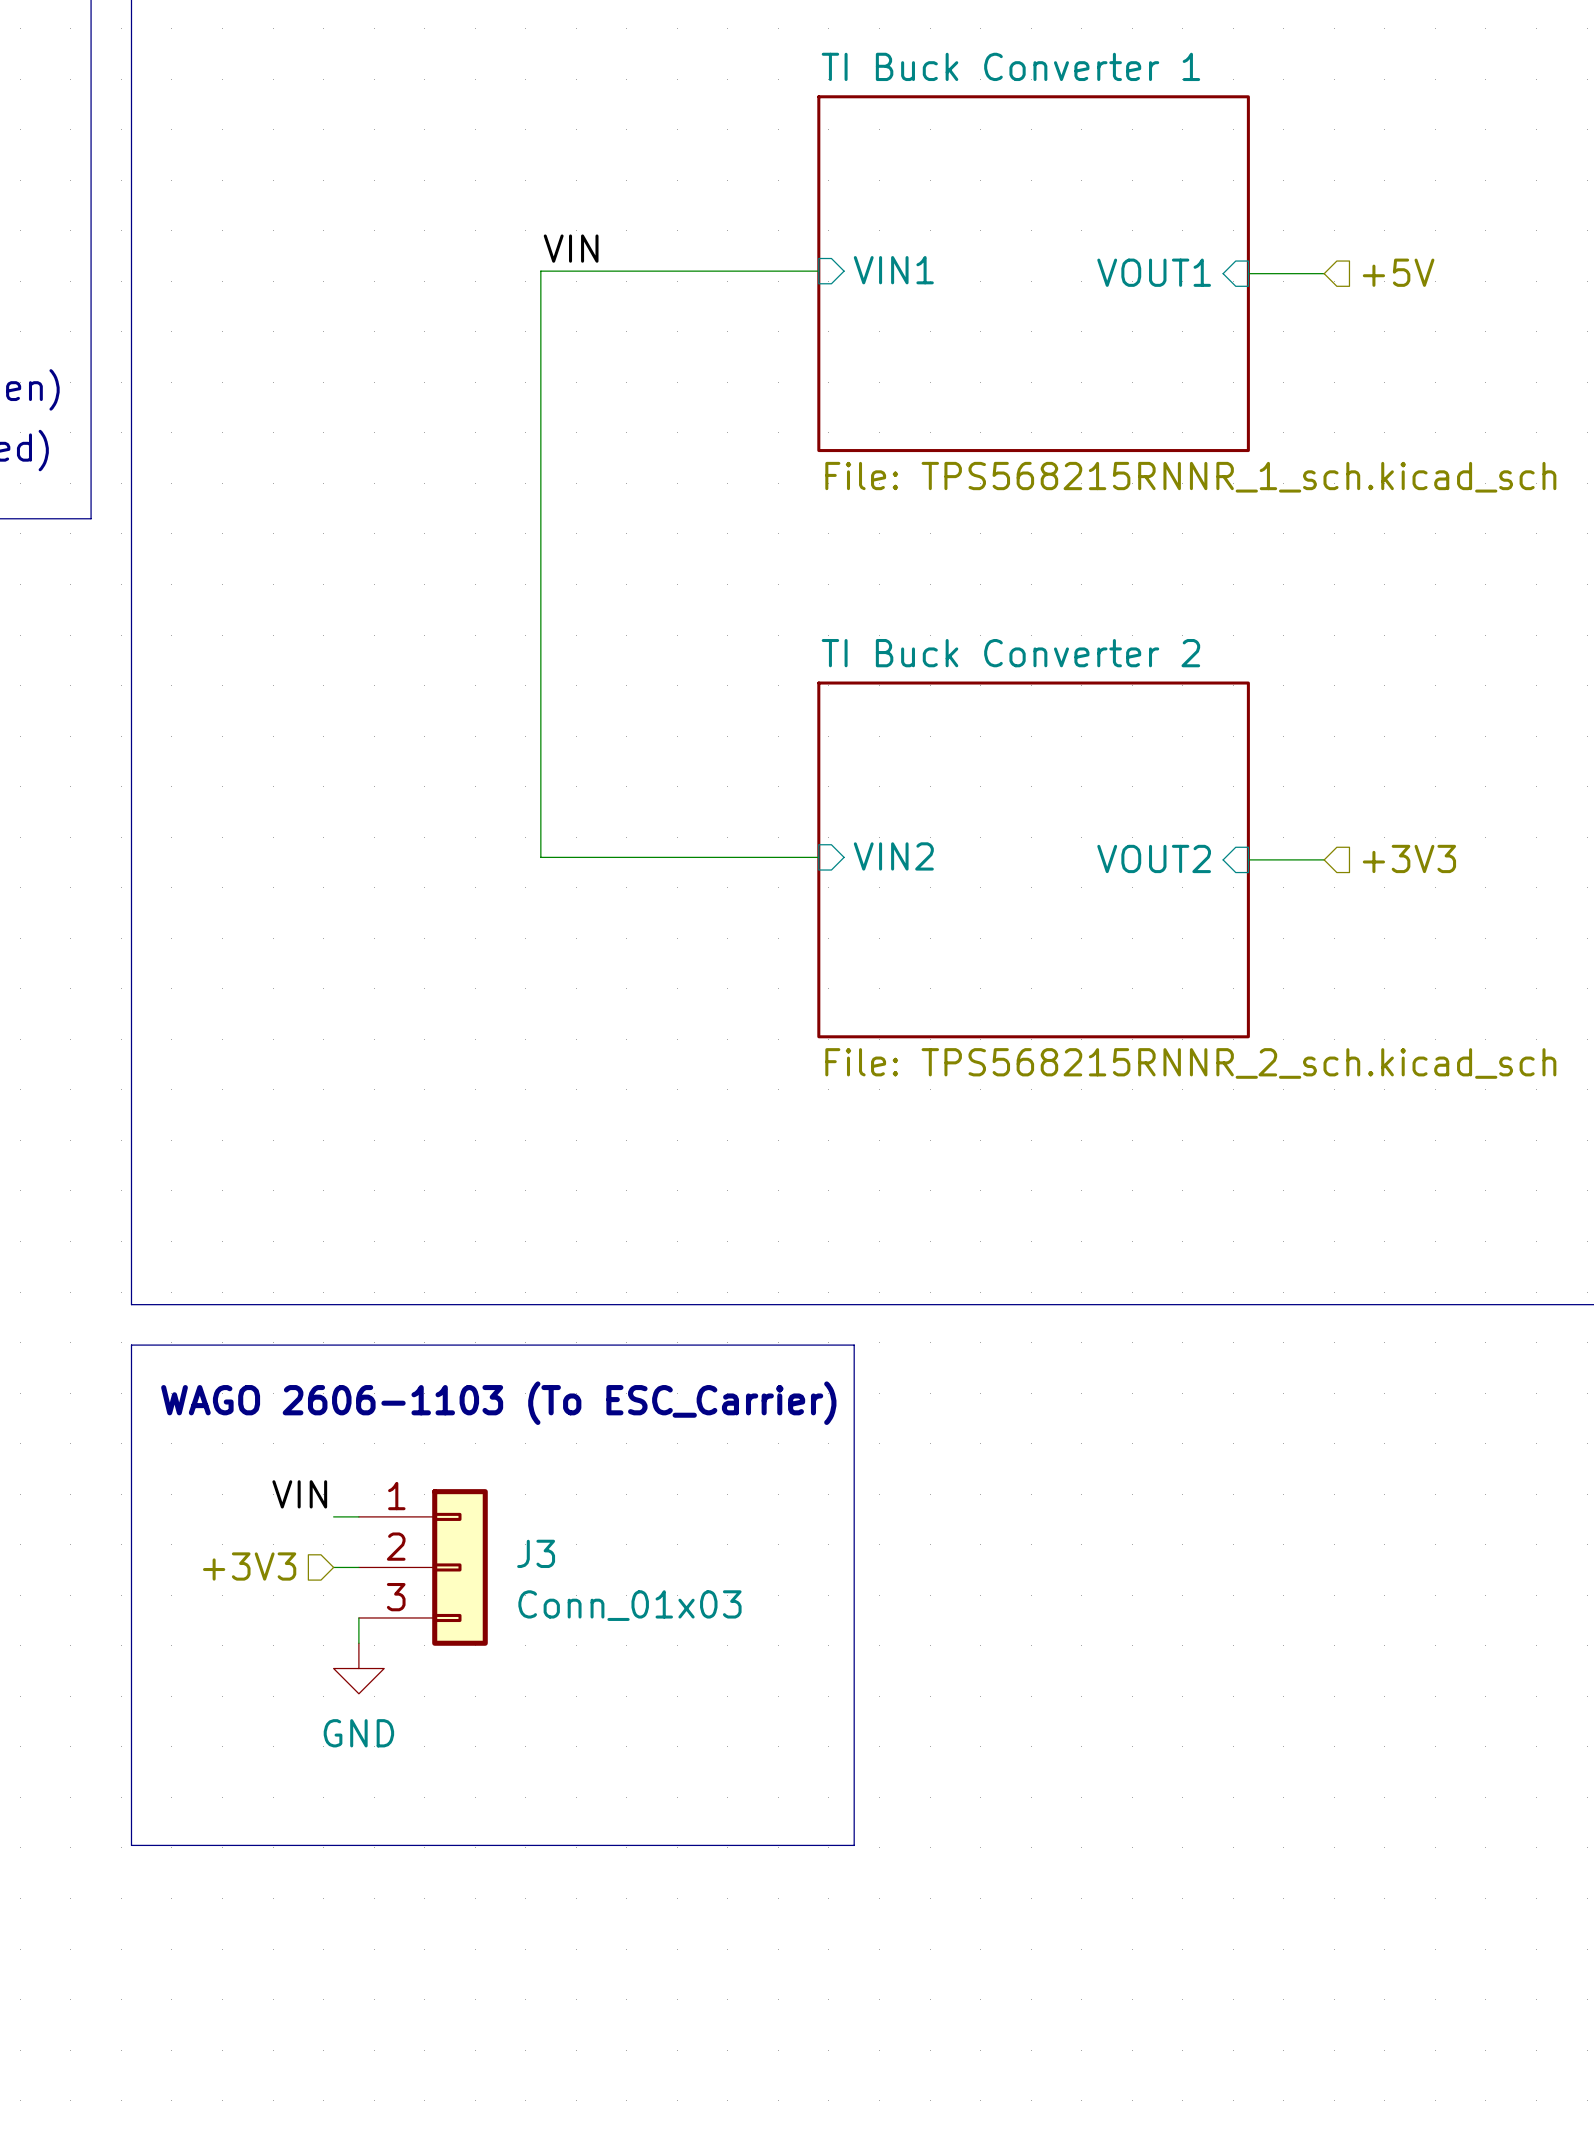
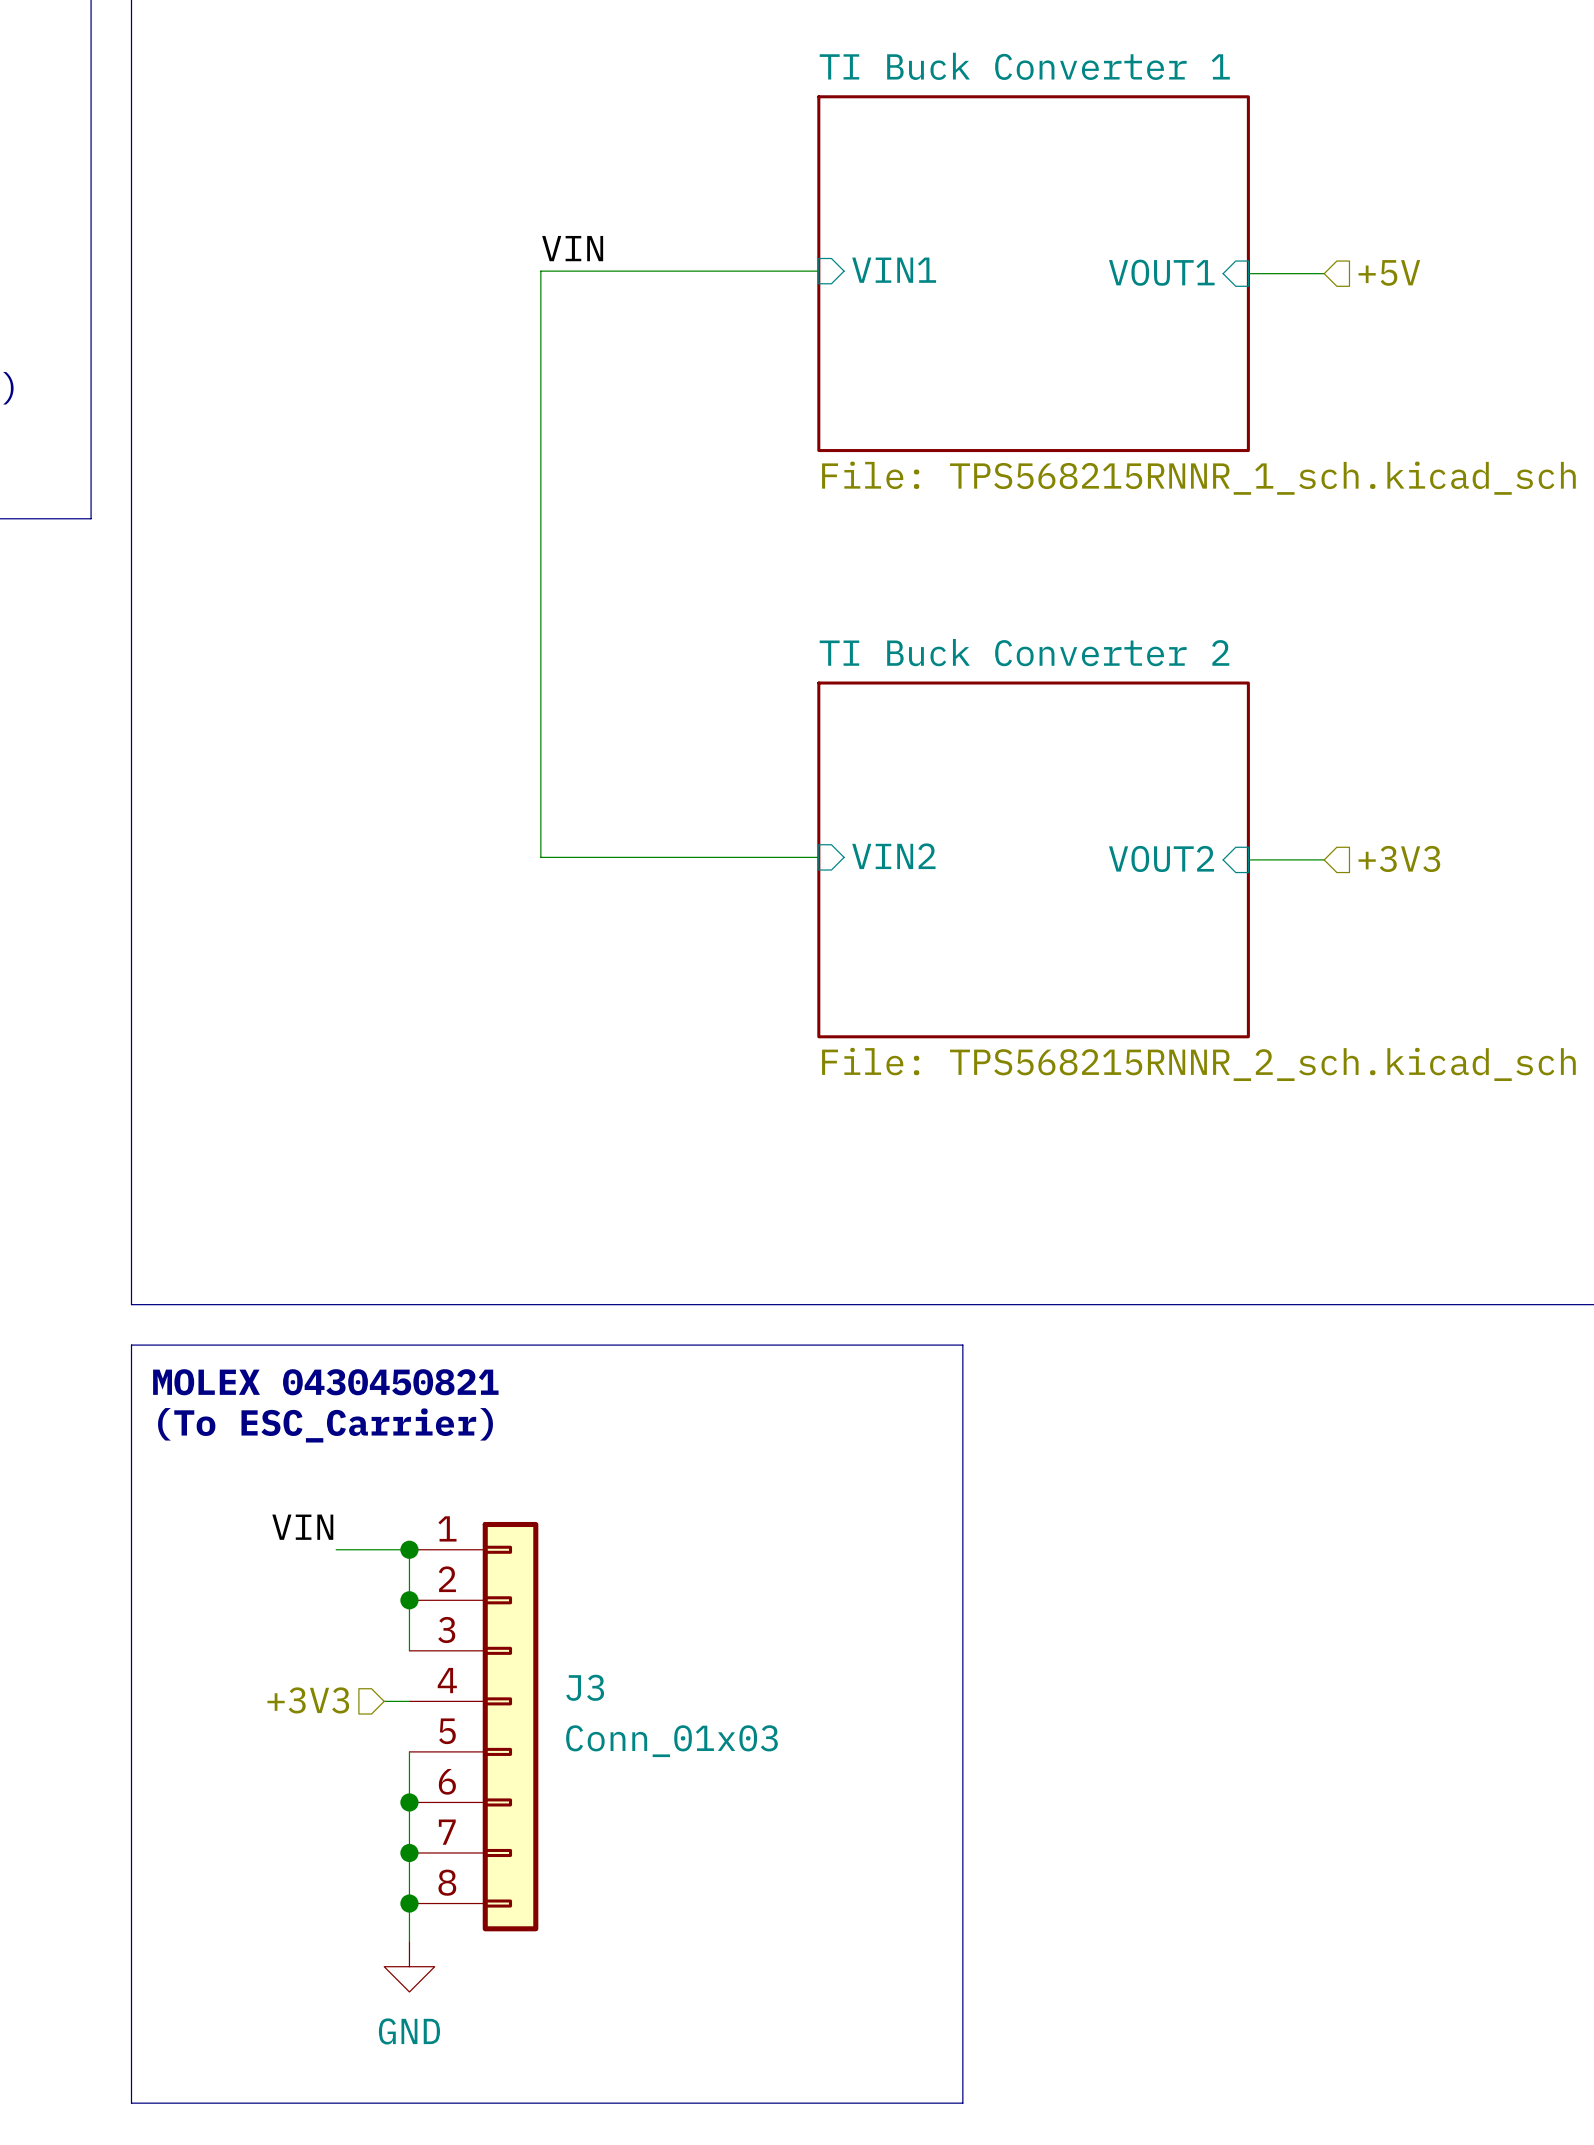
line: (854, 1345) (854, 1845) (131, 1845) -> (854, 1345) (962, 1345) (962, 2103) (131, 2103) (131, 1845)
text: none -> MOLEX 0430450821 (325, 1382)
text: WAGO 2606-1103 (To ESC_Carrier) (498, 1403) -> (To ESC_Carrier) (325, 1425)
J3 symbol: [358, 1489, 488, 1646] -> [409, 1521, 539, 1932]
label position: VIN (299, 1494) -> VIN (302, 1527)
wire: (333, 1516) (358, 1516) -> none
wire: none -> (336, 1549) (409, 1549) (409, 1650)
junction: none -> (409, 1549)
hierarchical label position: +3V3 (249, 1566) -> +3V3 (308, 1700)
wire: (333, 1567) (358, 1567) -> (384, 1701) (409, 1701)
junction: none -> (409, 1600)
wire: (358, 1617) (358, 1643) -> none
power symbol position: GND (358, 1668) -> GND (409, 1966)
wire: none -> (409, 1751) (409, 1941)
junction: none -> (409, 1802)
junction: none -> (409, 1852)
junction: none -> (409, 1903)

